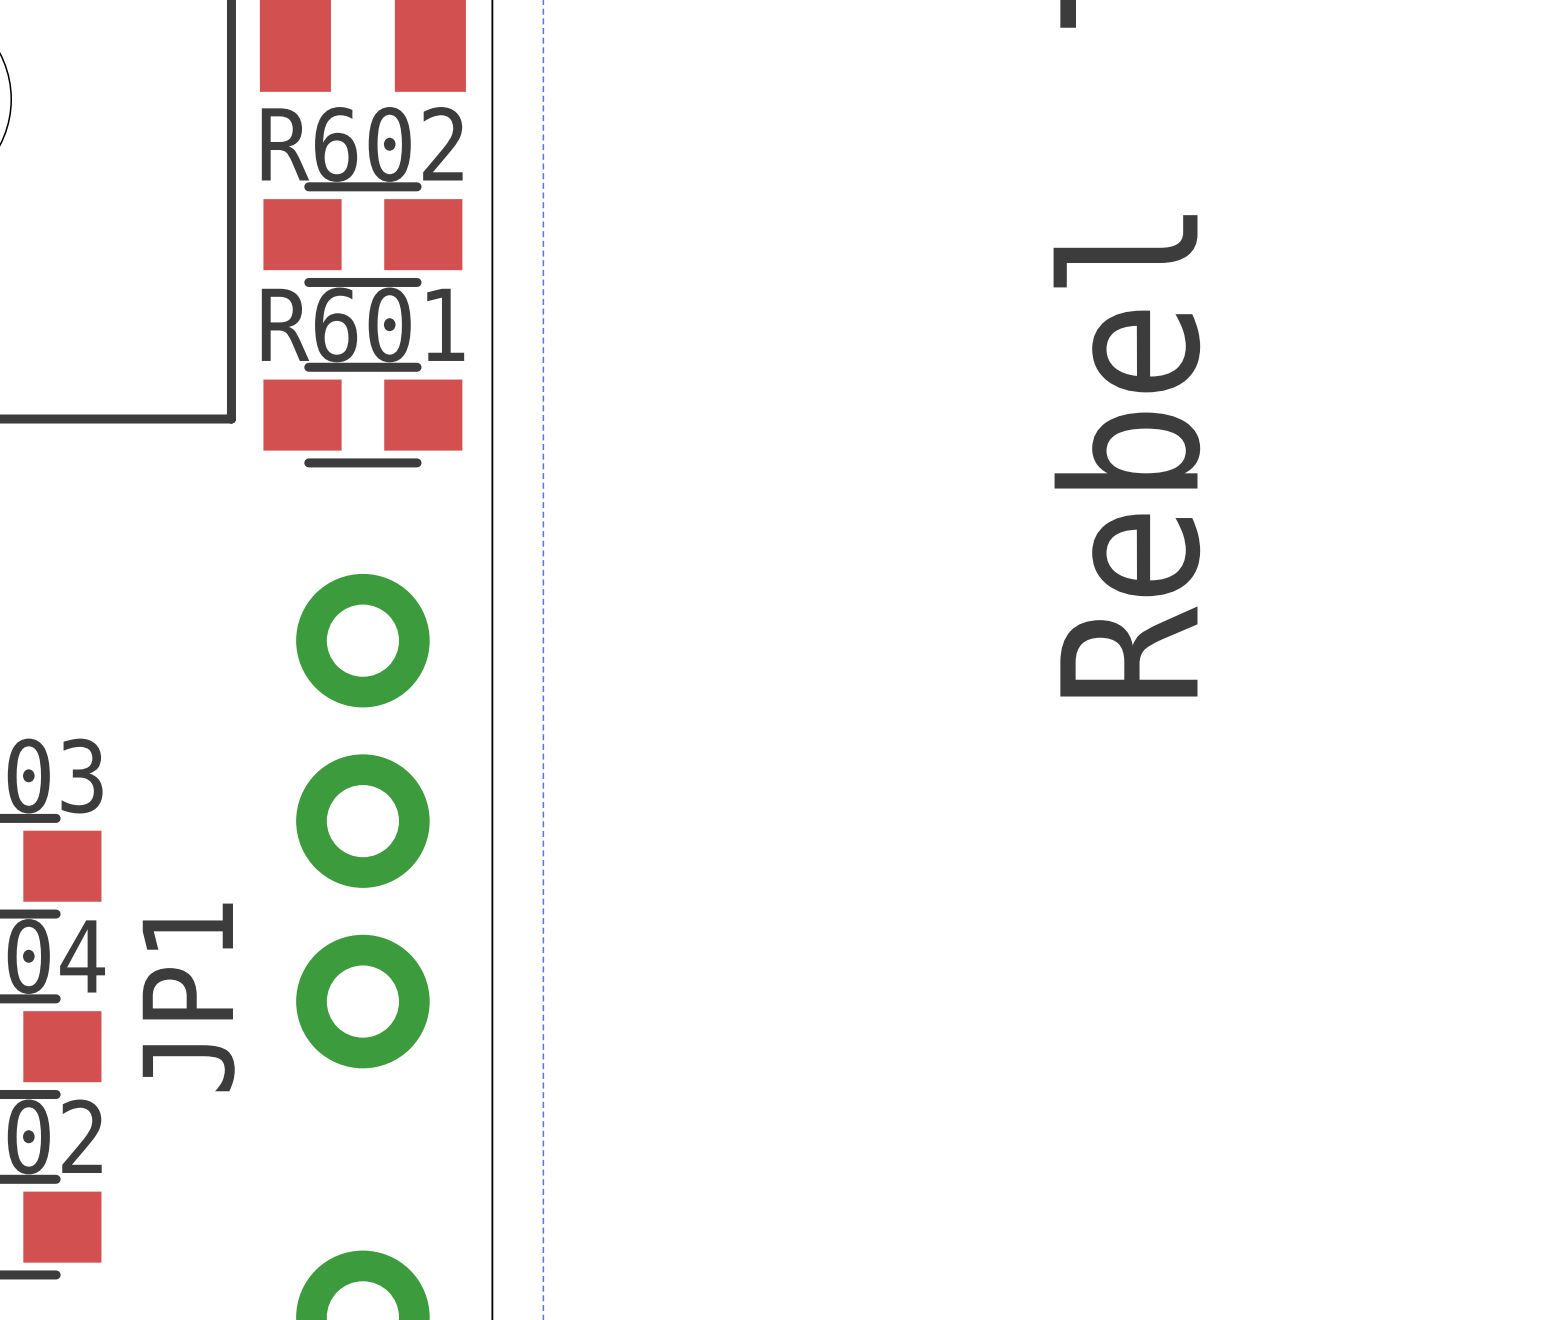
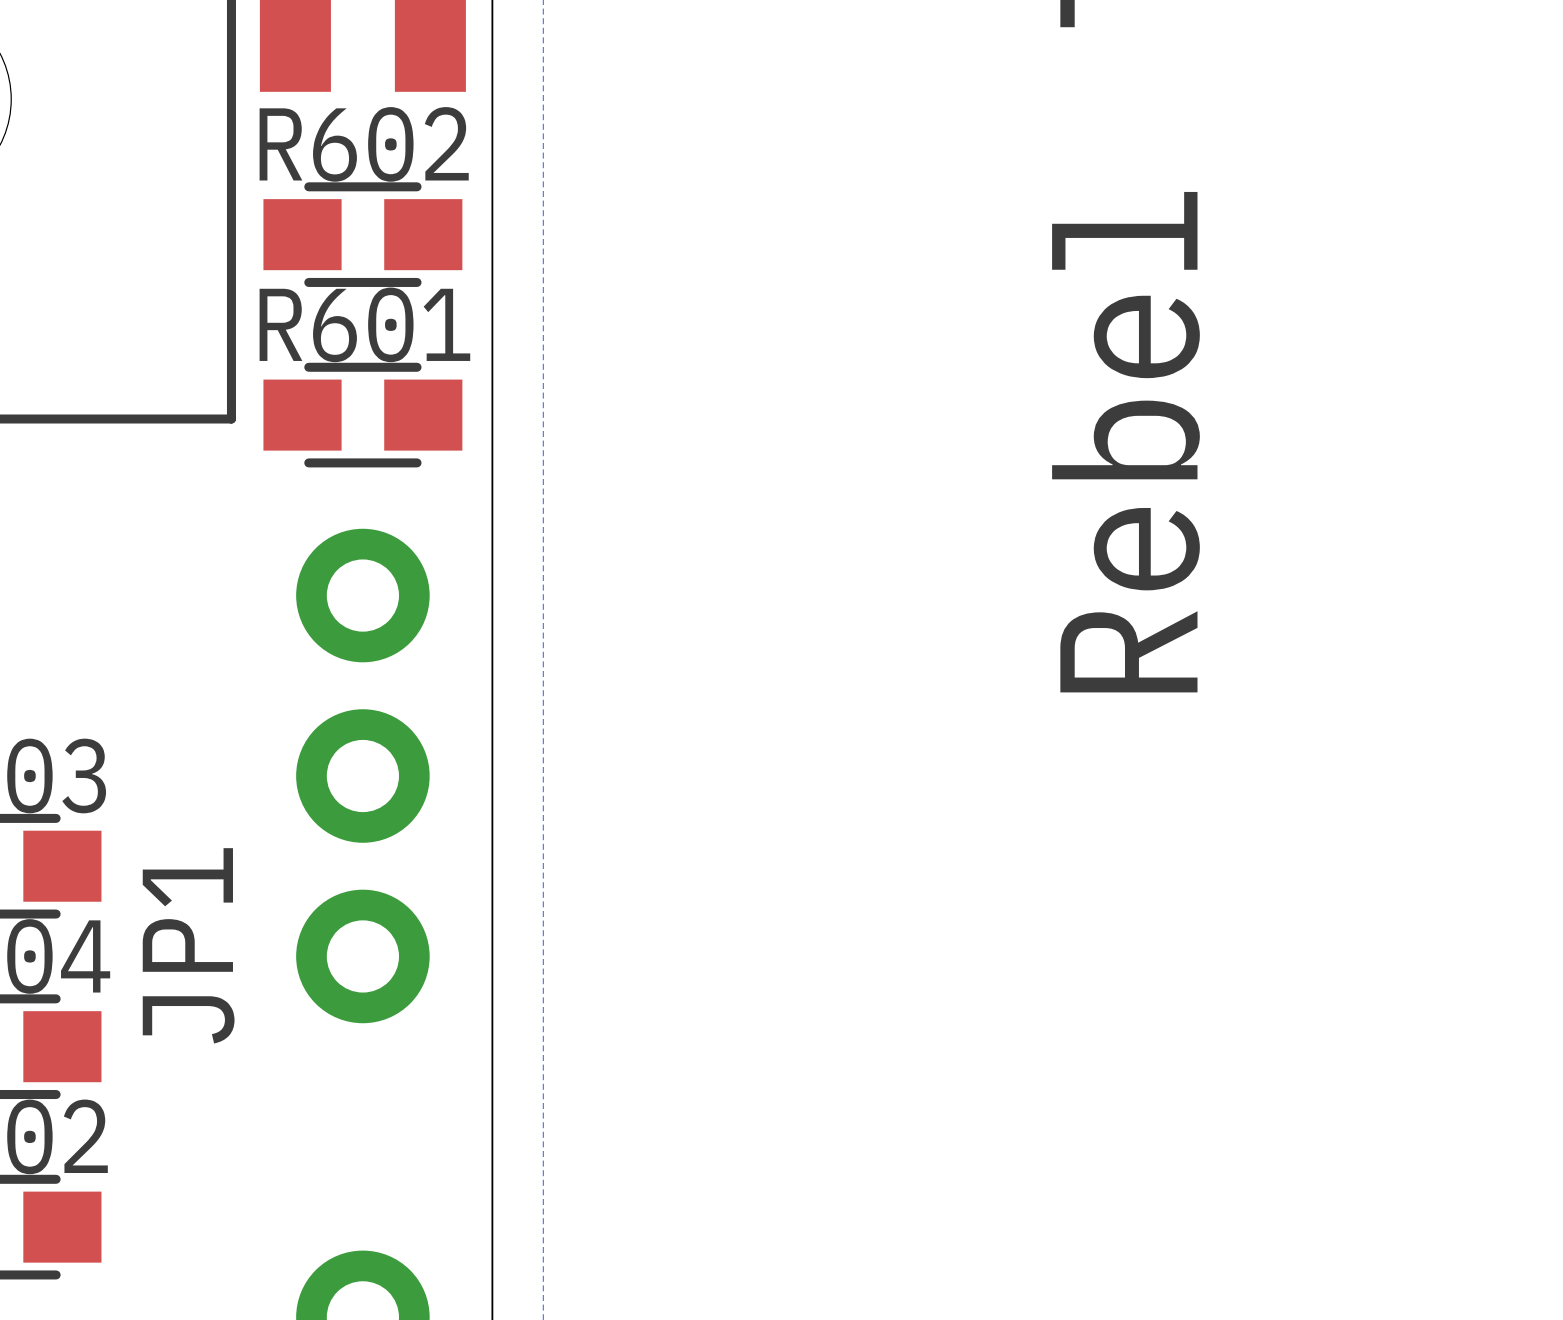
JP1 position: (362, 821) -> (362, 776)

